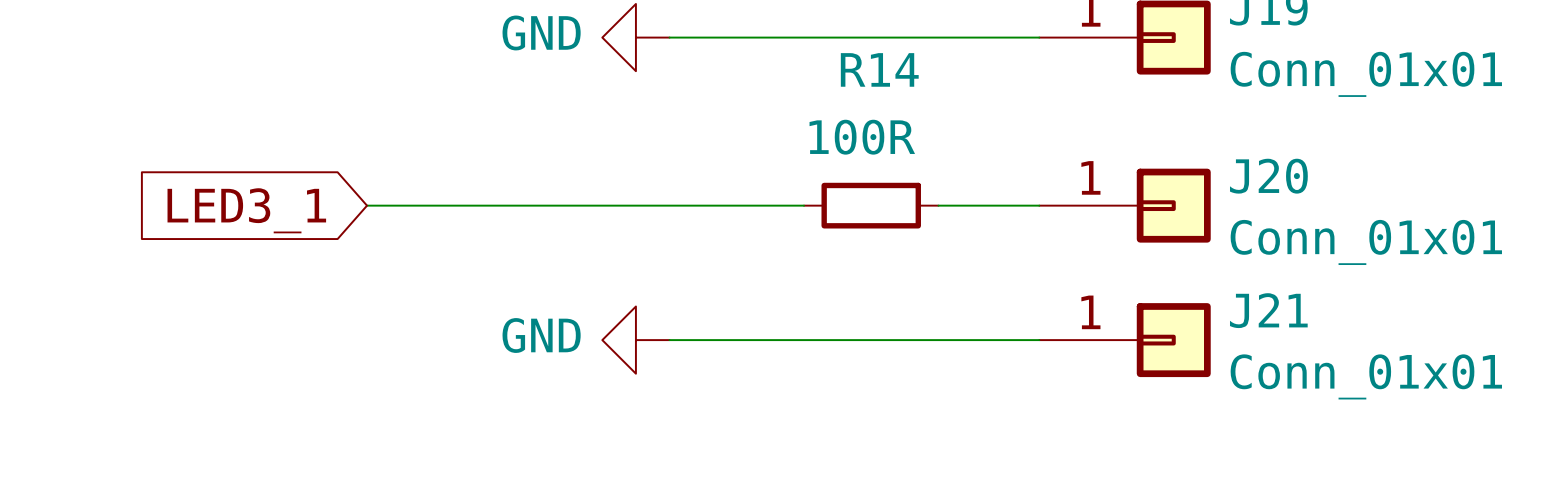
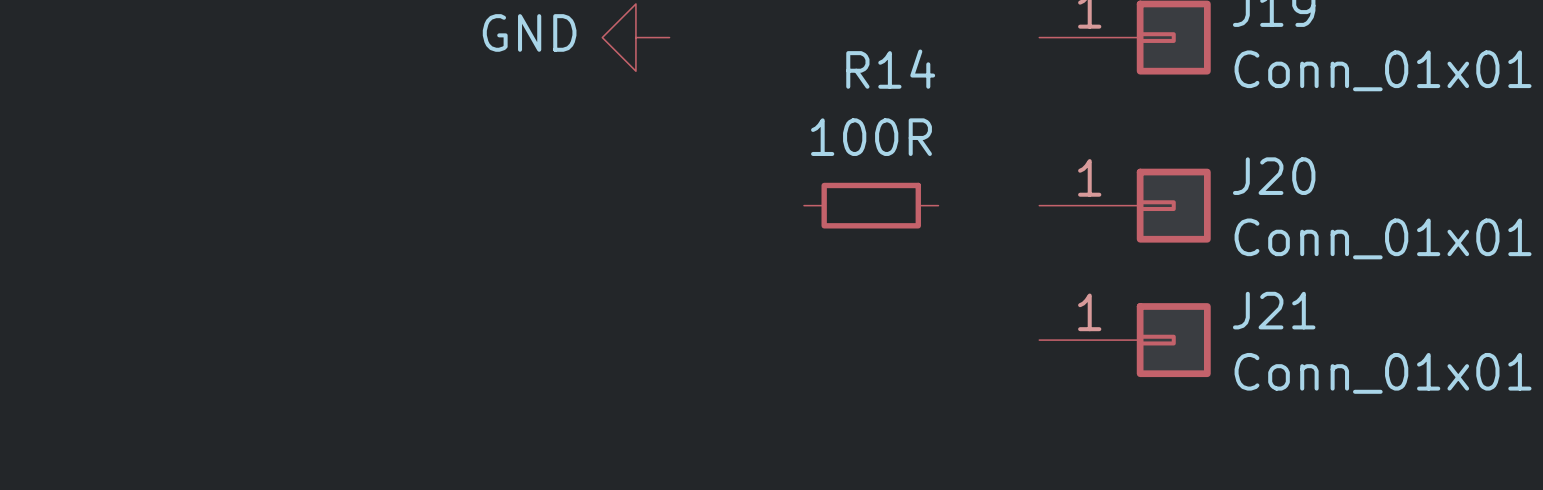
wire: (669, 37) (1039, 37) -> none
wire: (367, 205) (804, 205) -> none
wire: (938, 205) (1039, 205) -> none
global label: LED3_1 (246, 210) -> none
power symbol: GND (635, 340) -> none
wire: (669, 340) (1039, 340) -> none

